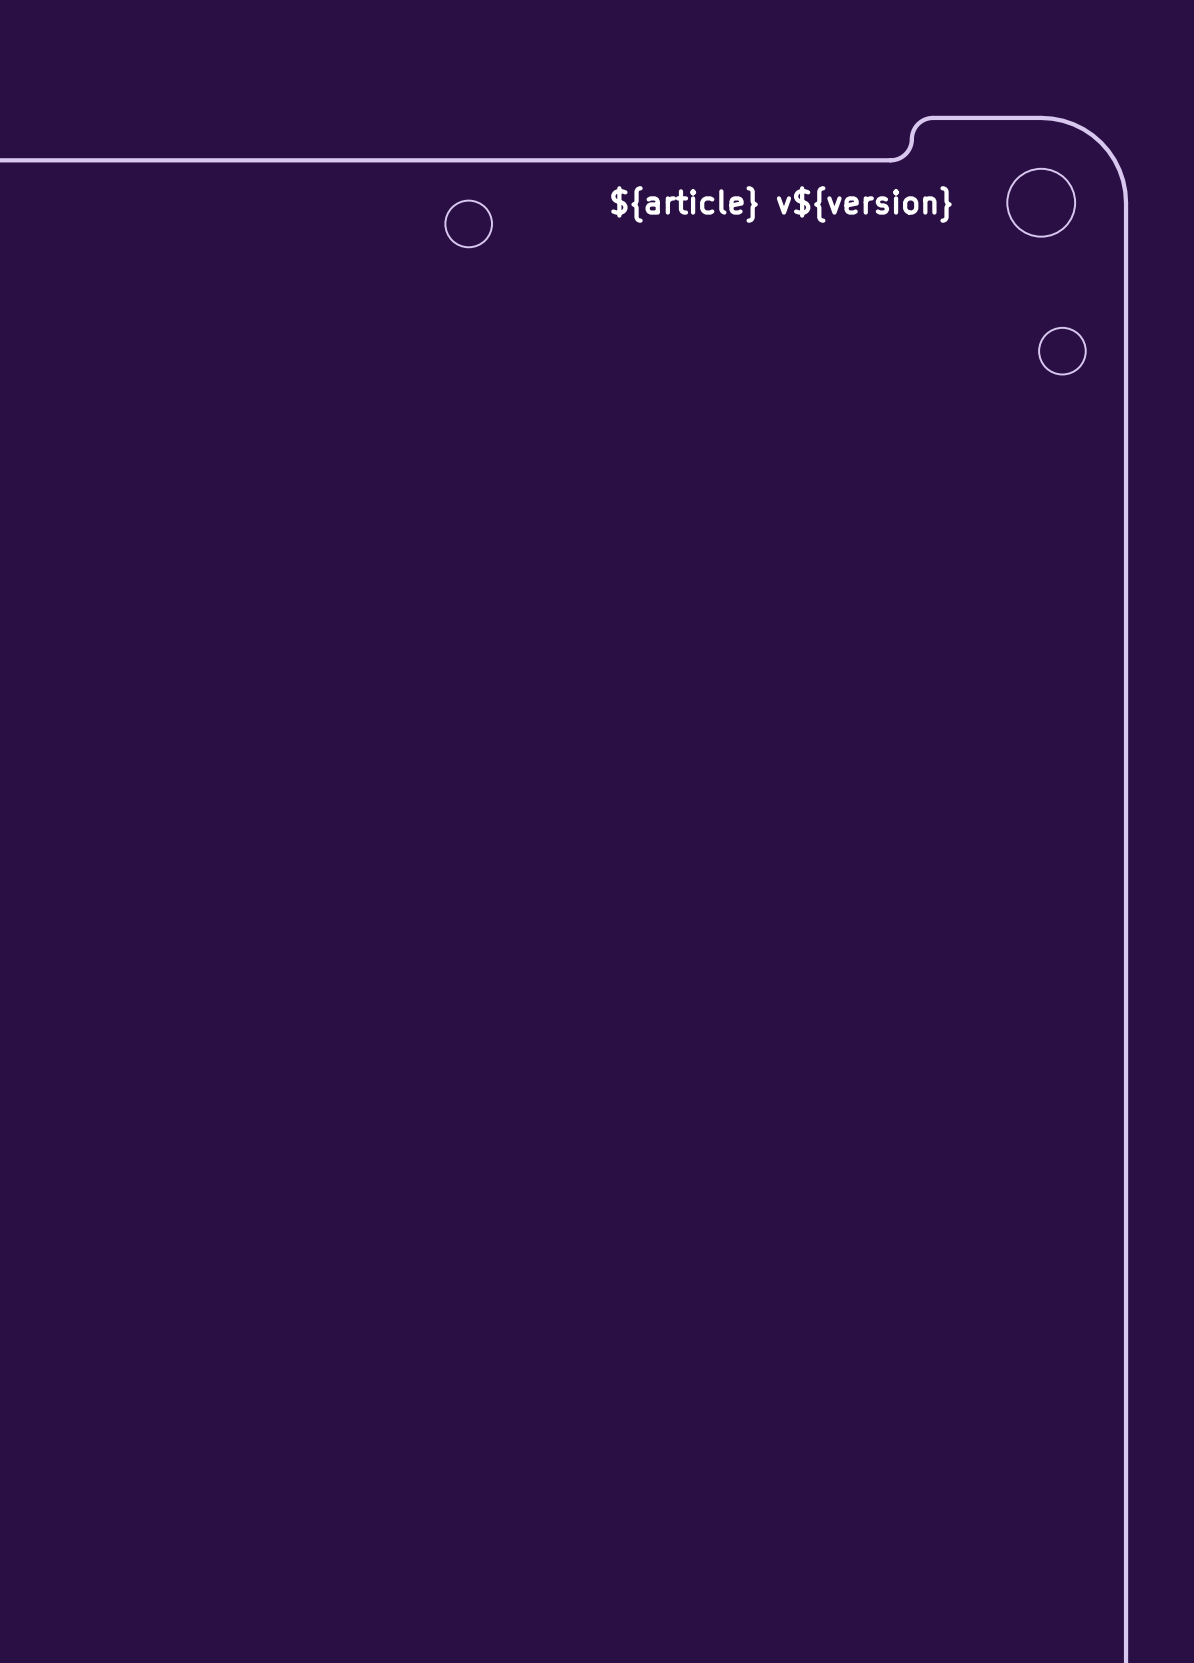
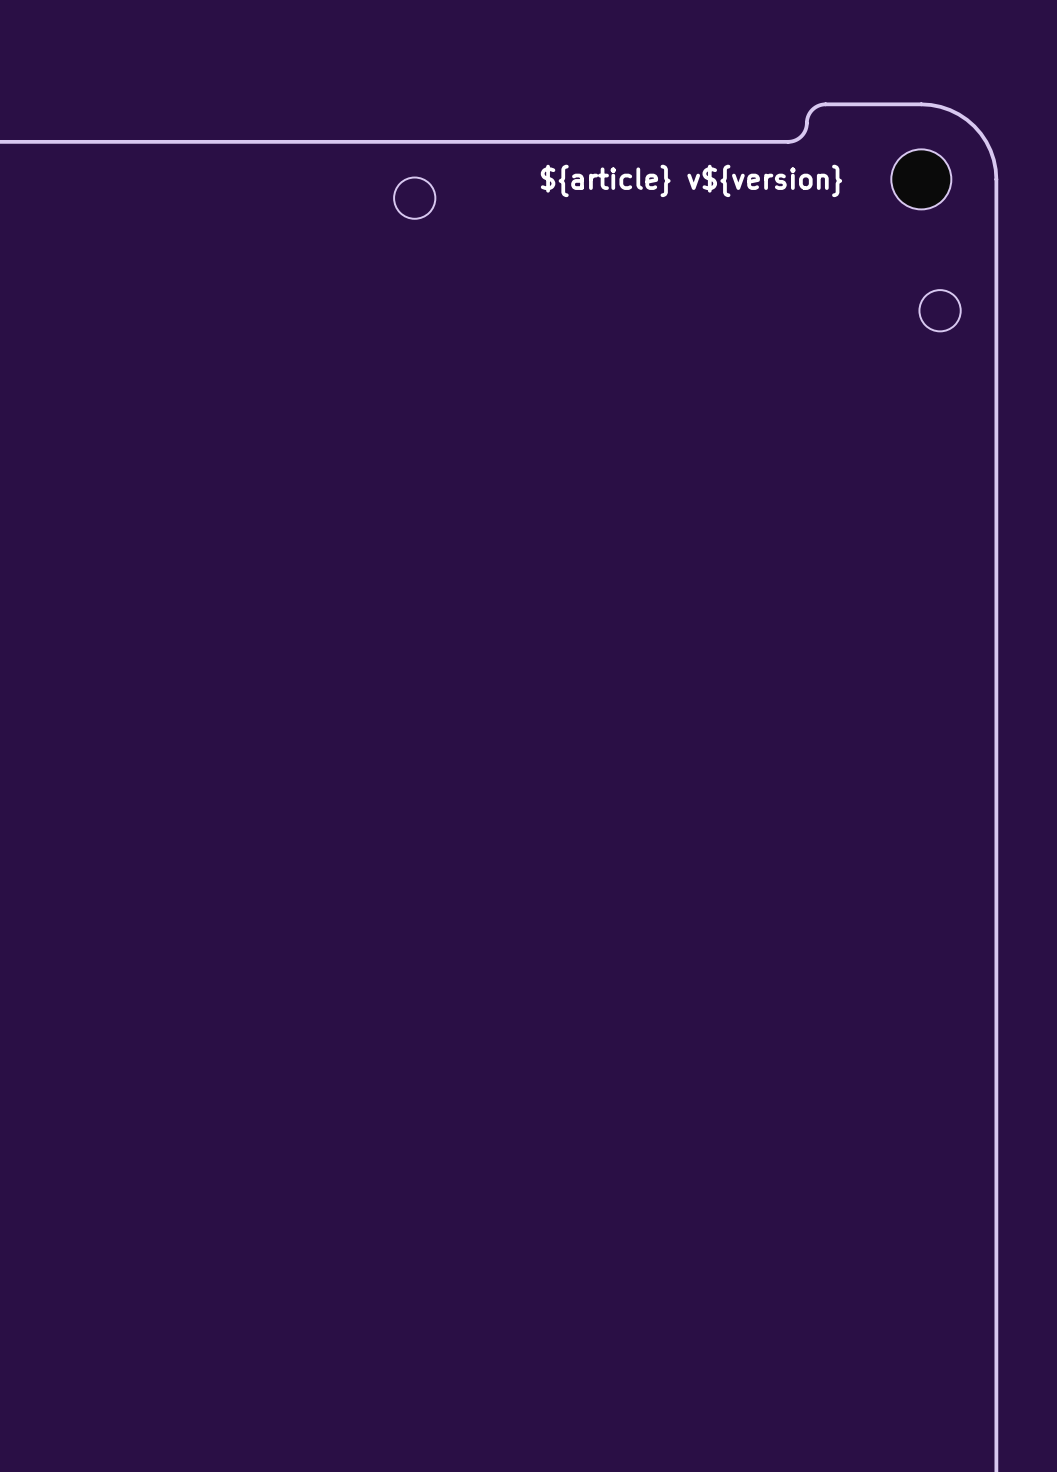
drawing: [1006, 168, 1076, 238] -> none
part: none -> (921, 179)

